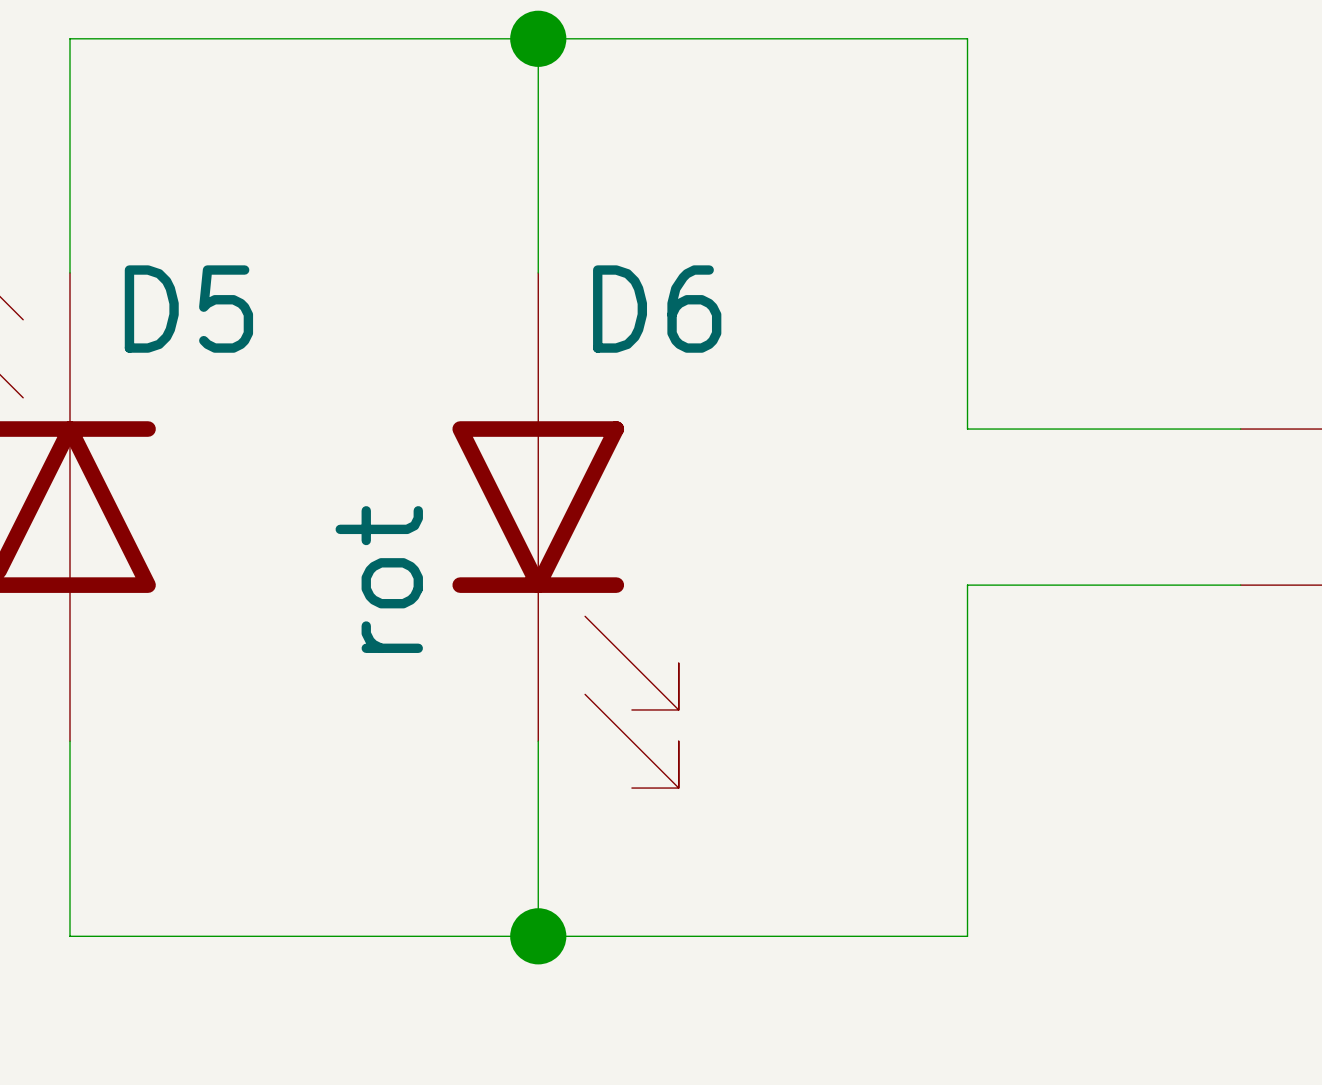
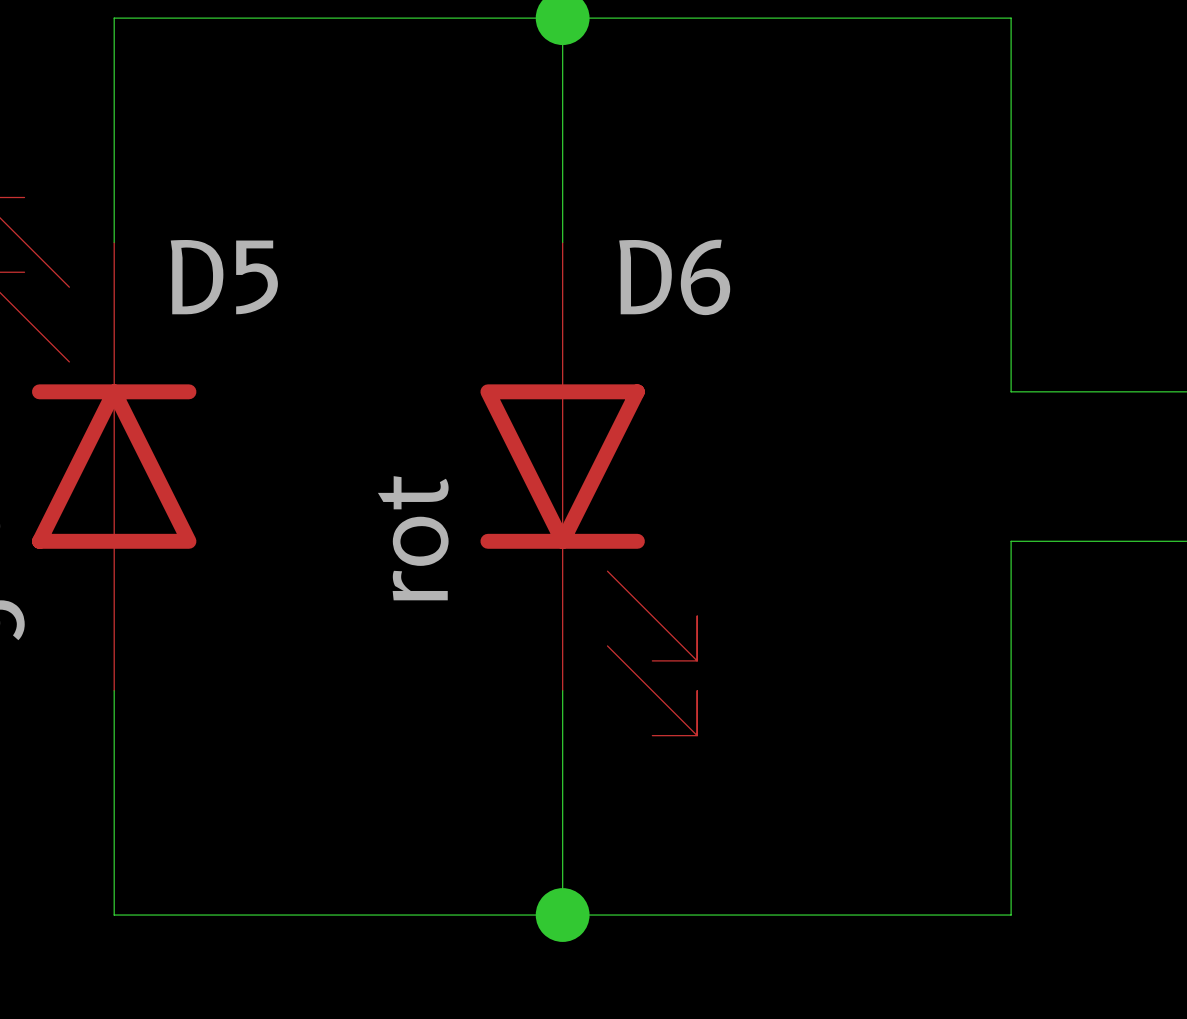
wire: (967, 38) (967, 429) (1006, 429) -> (973, 18) (1011, 18) (1011, 391)
wire: (1006, 585) (967, 585) (967, 936) (70, 936) -> (1011, 541) (1011, 915) (114, 915) (114, 877)
junction position: (538, 936) -> (562, 915)

